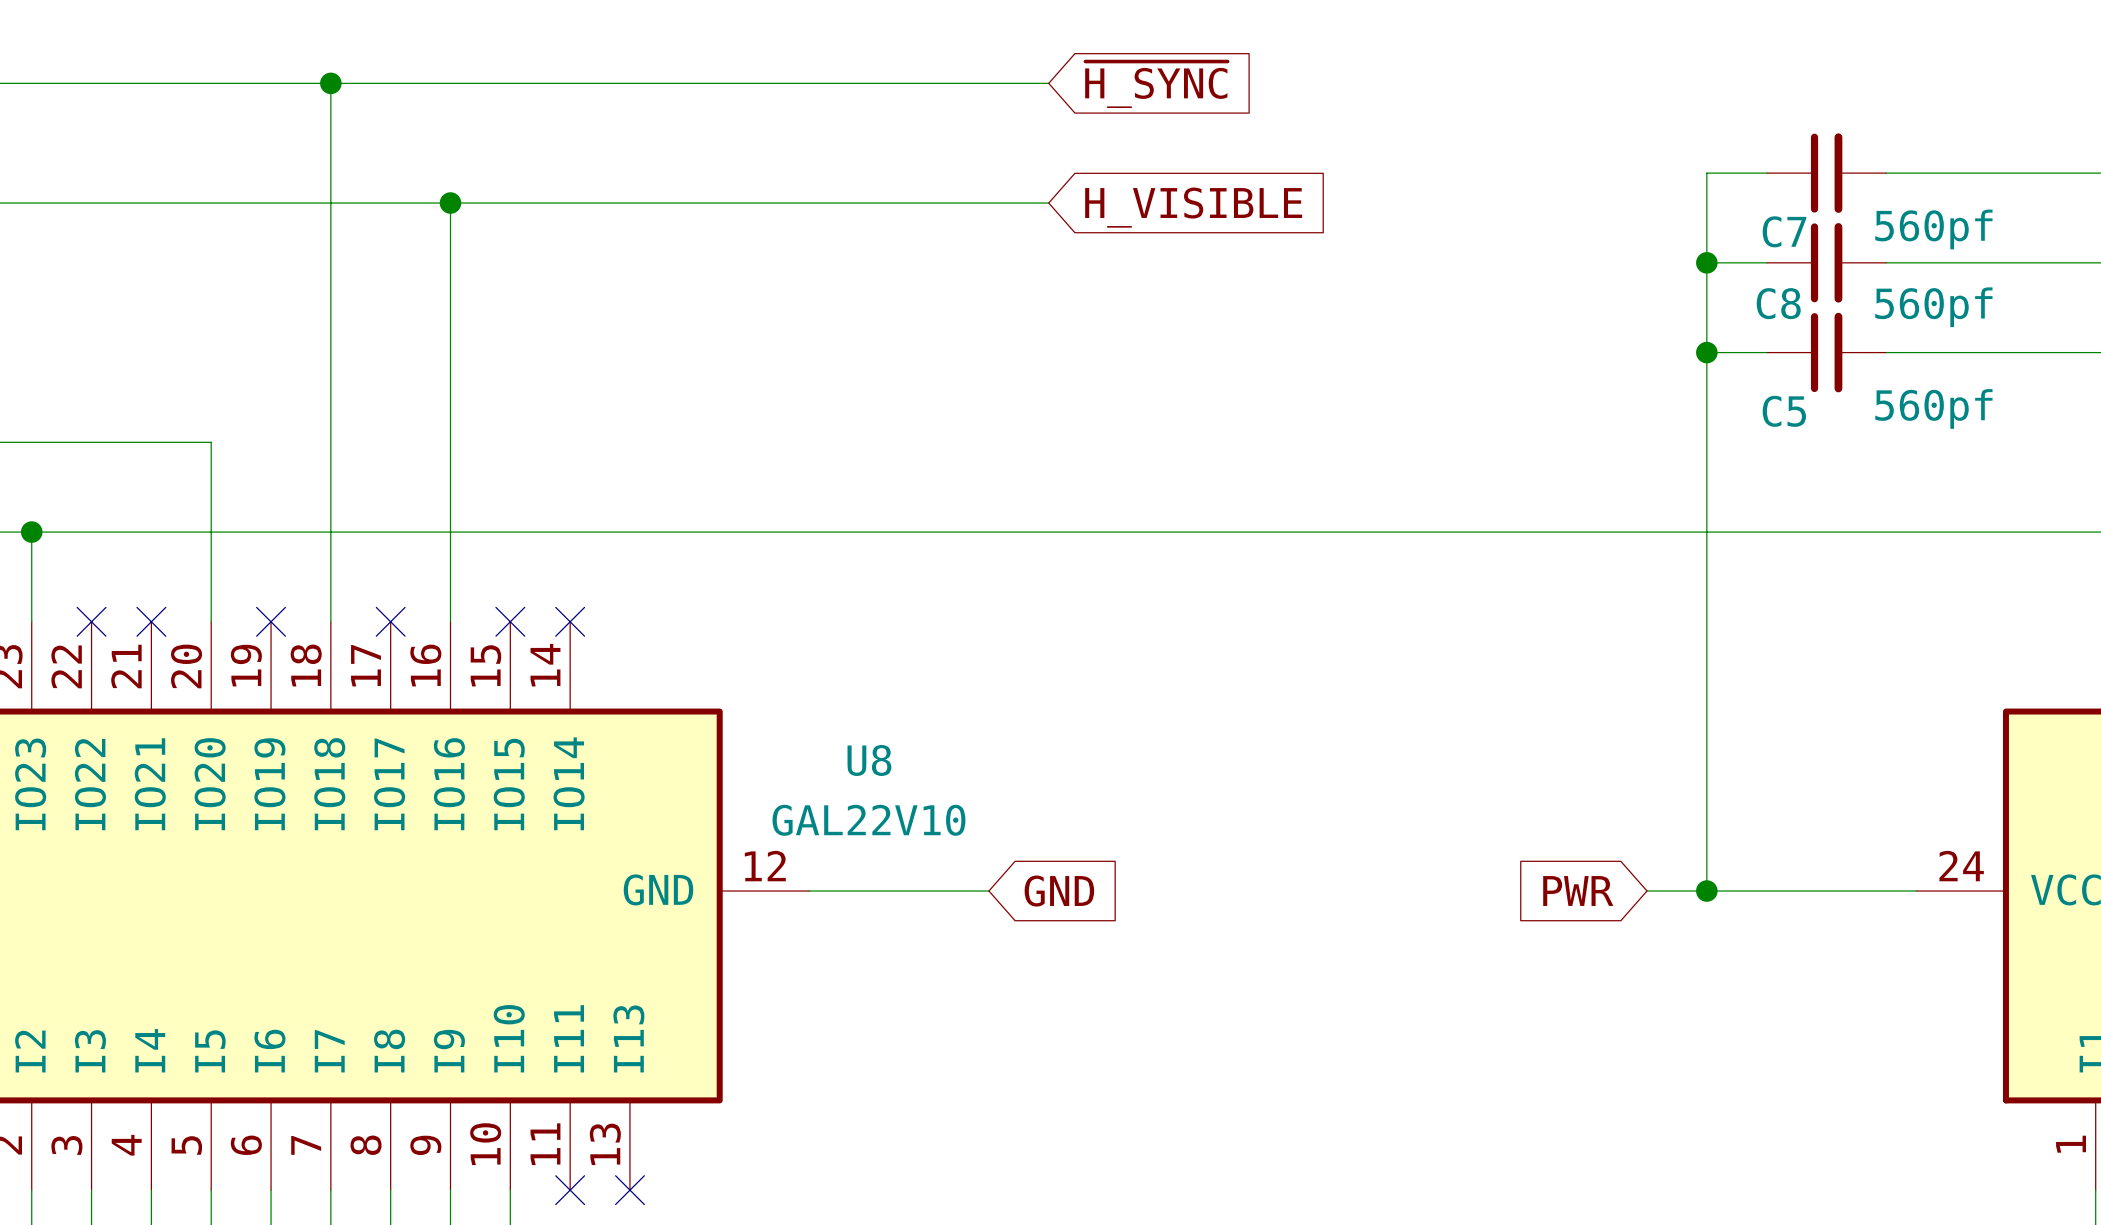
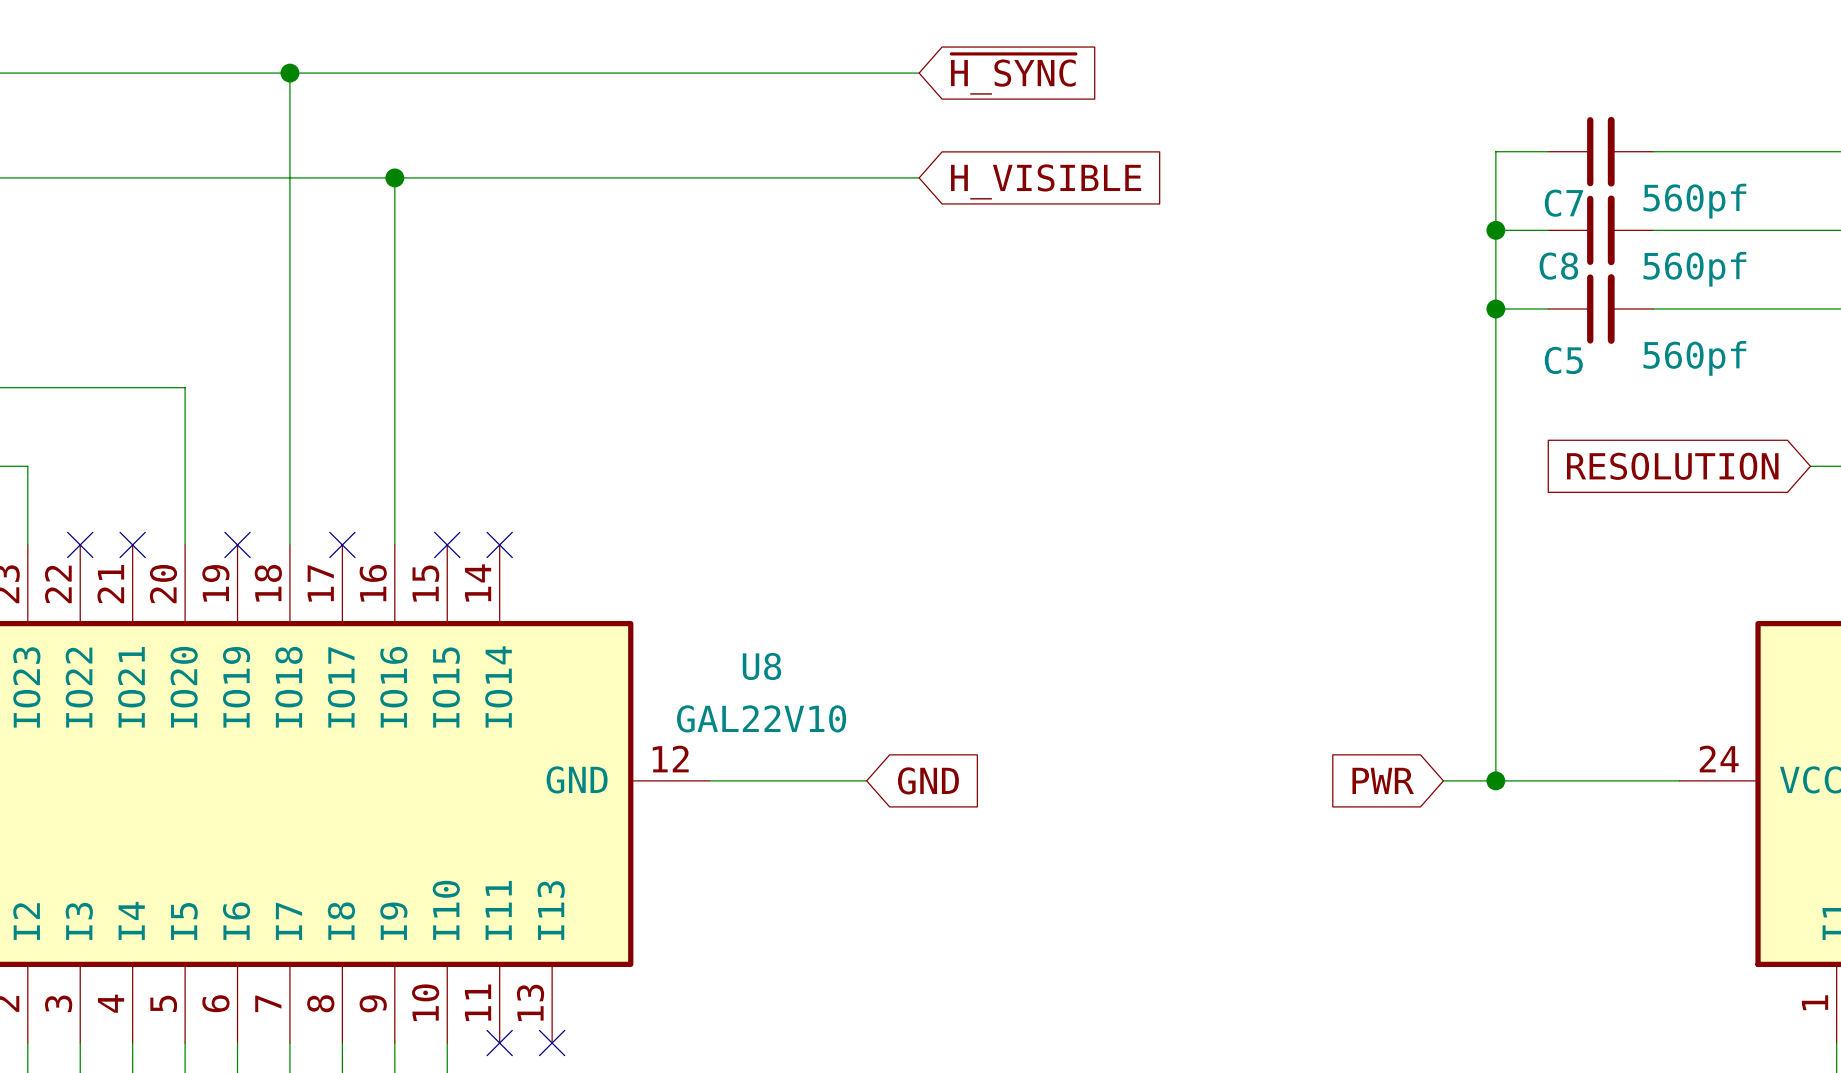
wire: (31, 532) (2065, 532) -> none
junction: (31, 532) -> none
global label: none -> RESOLUTION (1672, 466)

